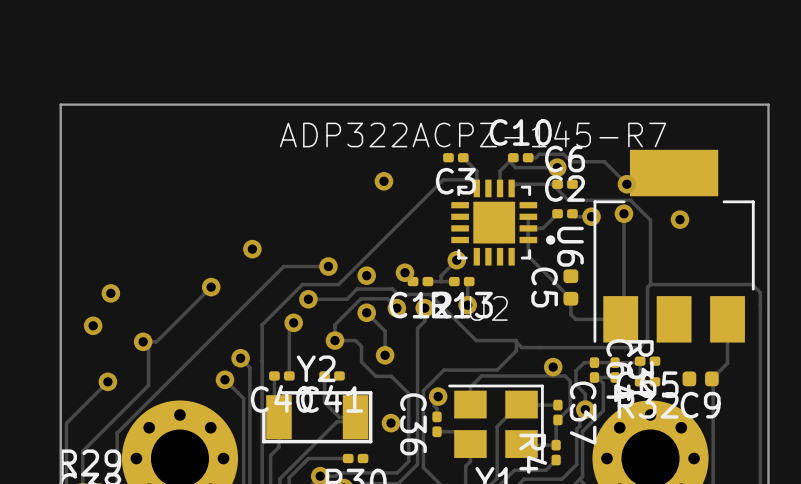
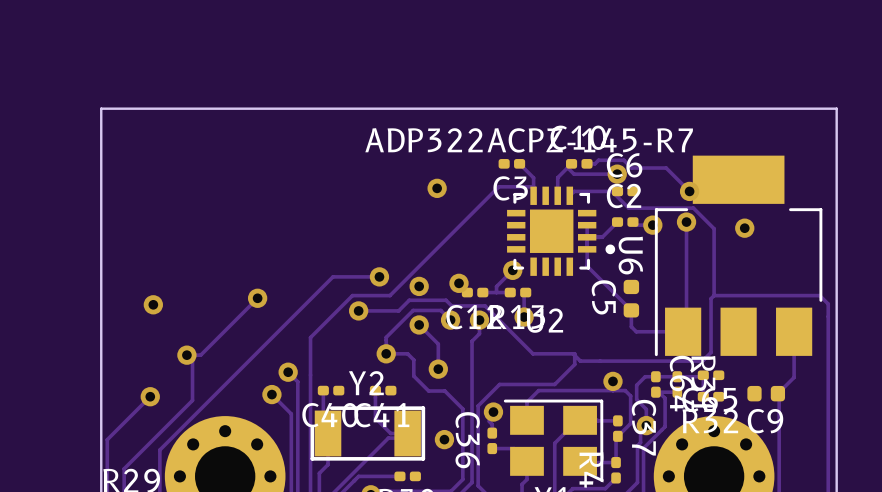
via: (252, 249) -> none
track: (293, 322) (289, 327) (289, 375) -> none
via: (293, 322) -> none
via: (93, 325) -> none

